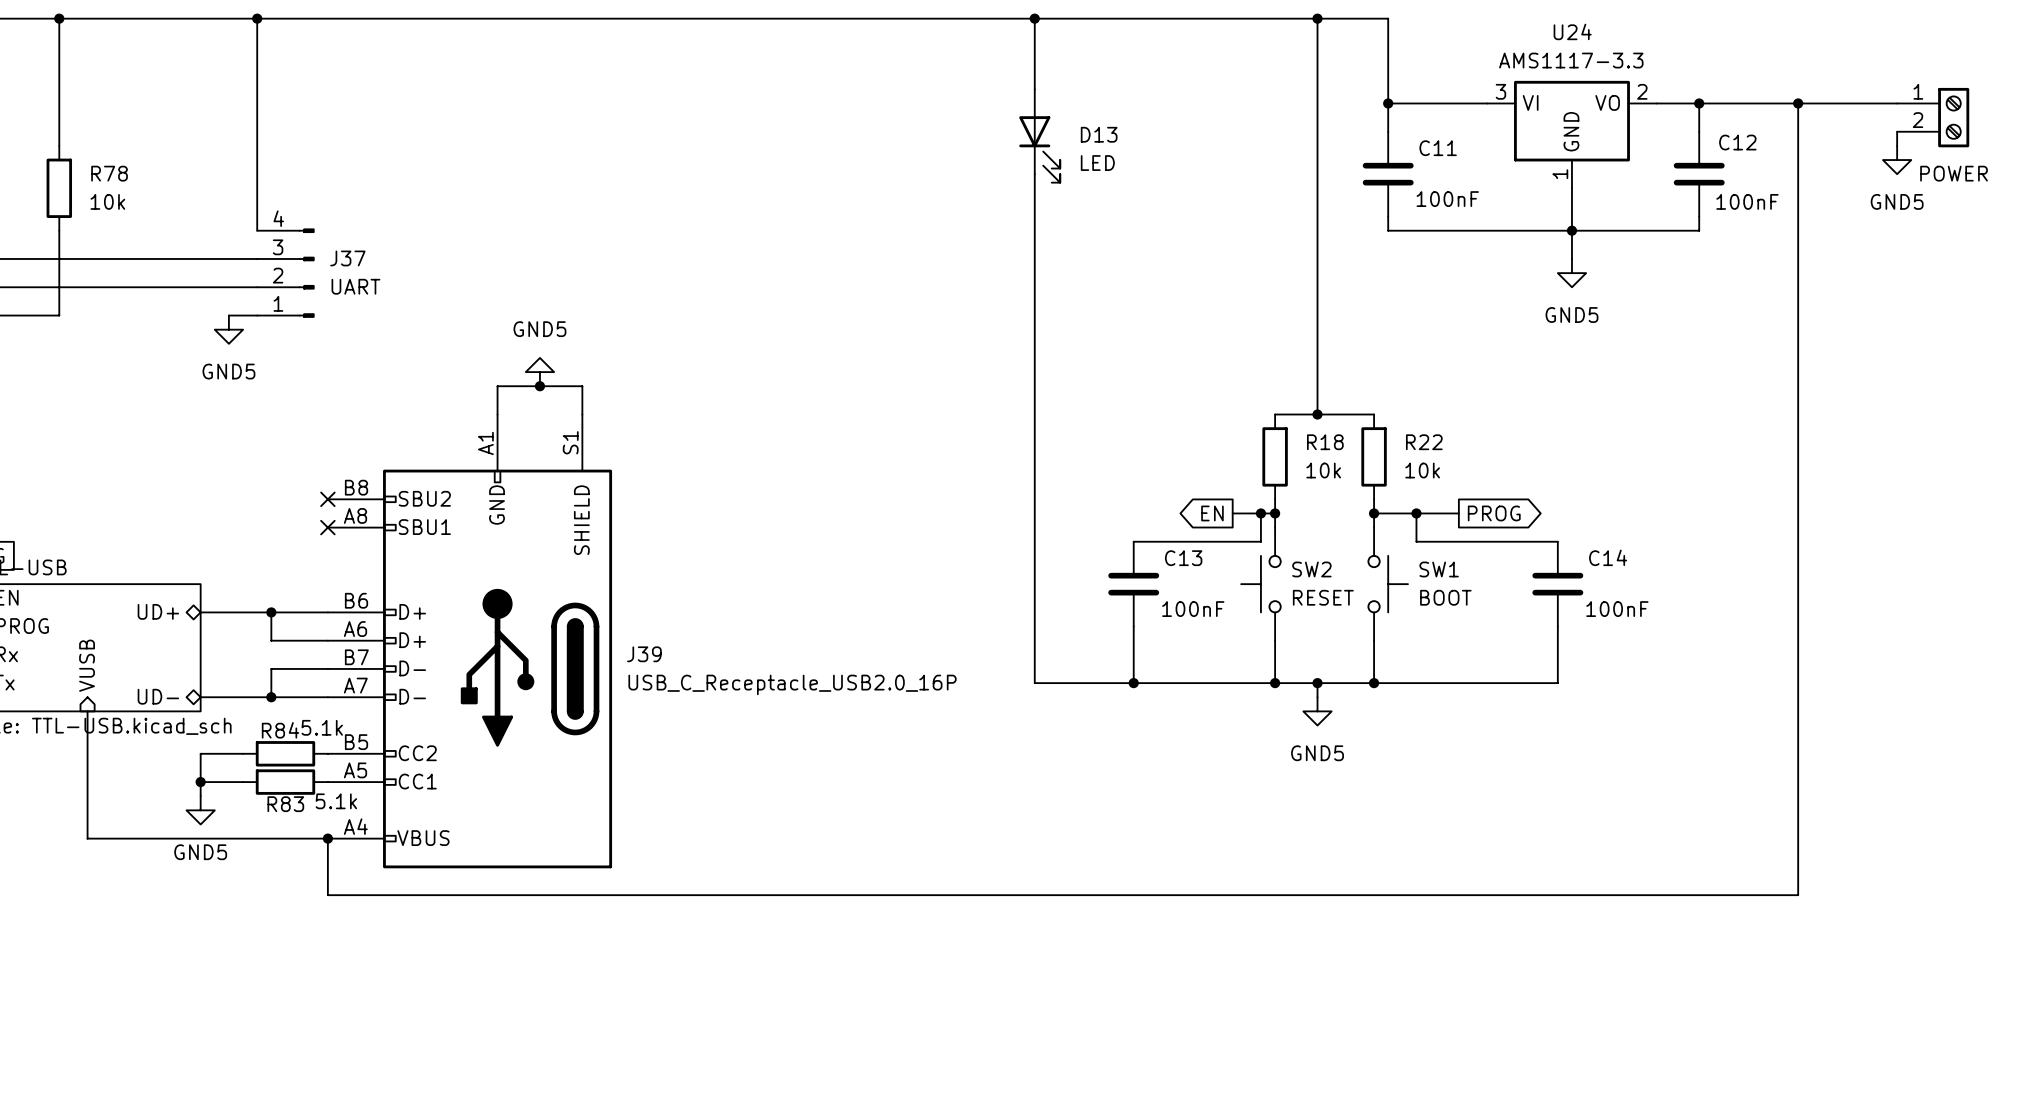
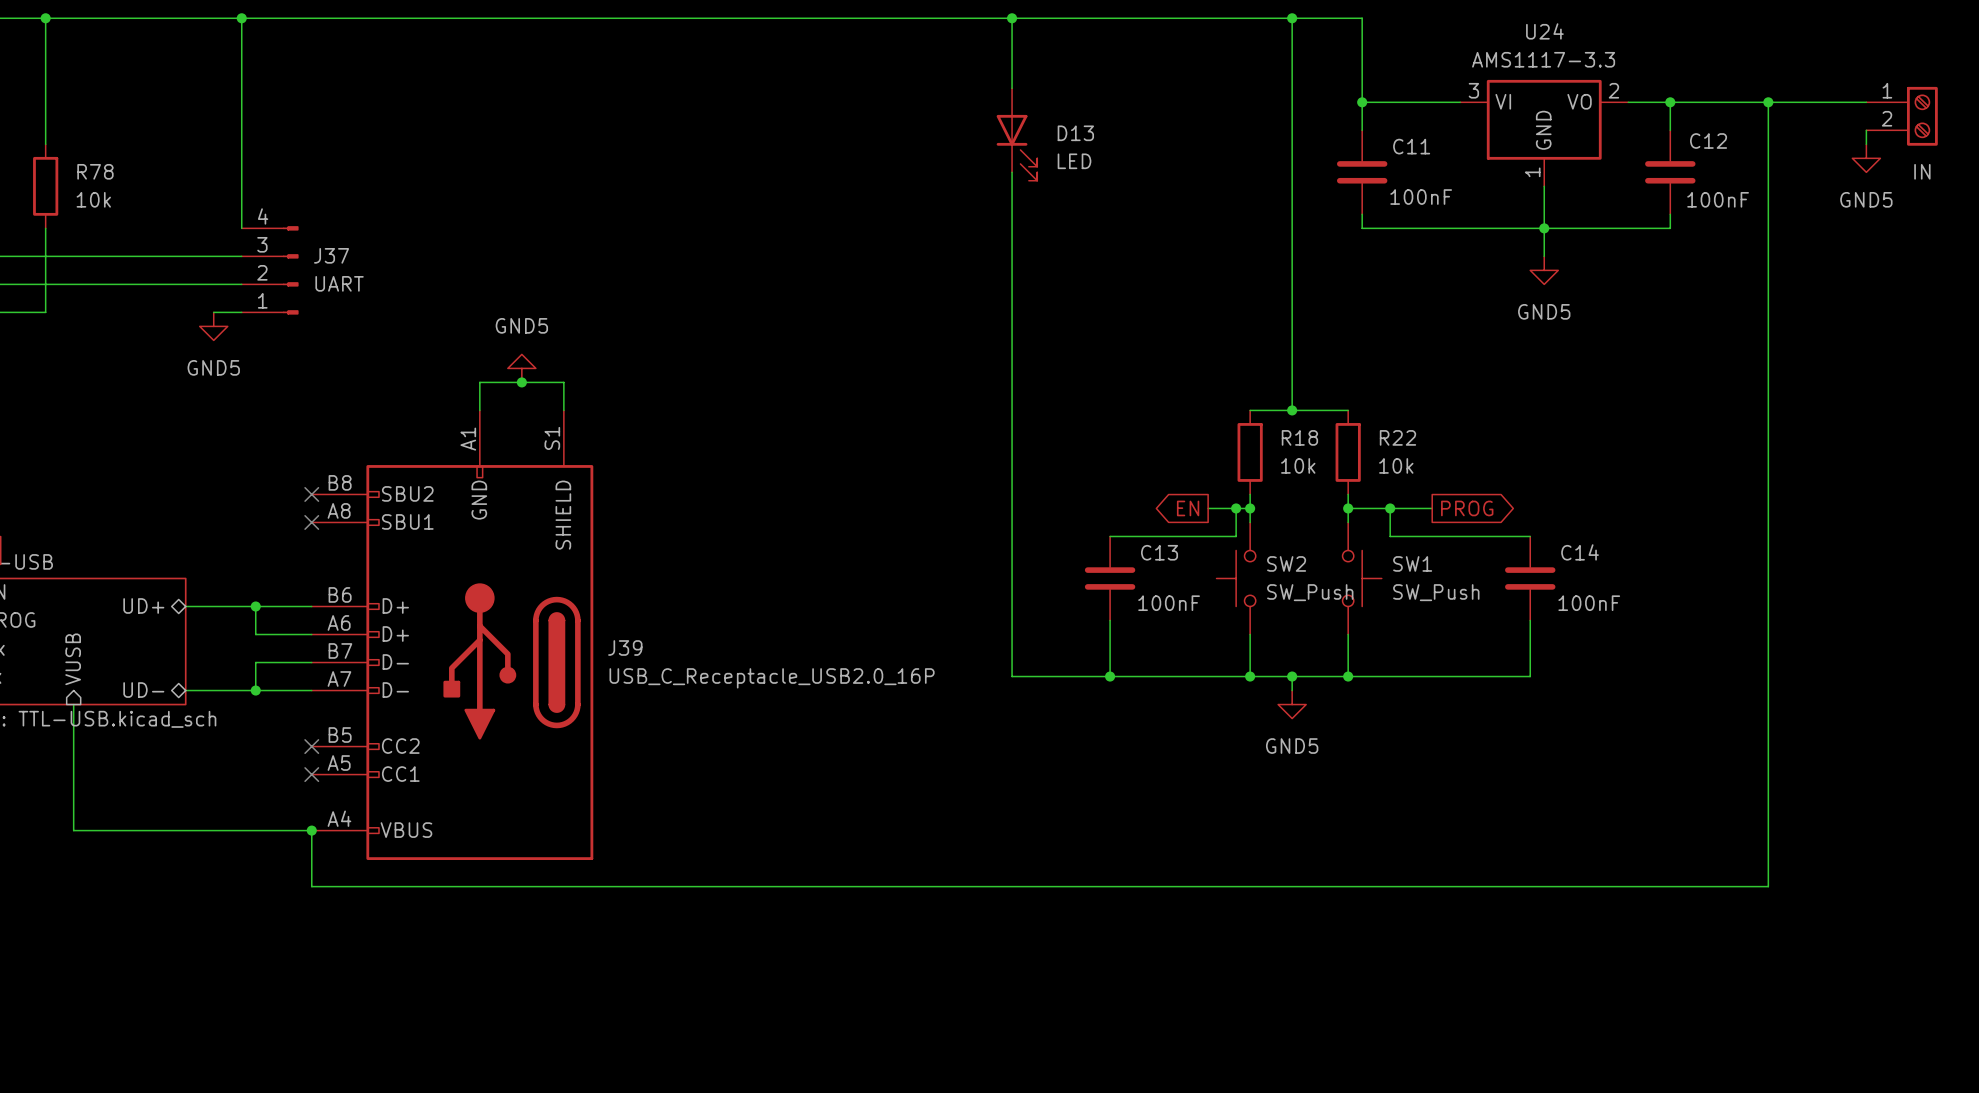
part value: POWER (1954, 173) -> IN (1922, 171)
SW2 value: RESET (1323, 597) -> SW_Push (1310, 592)
SW1 value: BOOT (1445, 597) -> SW_Push (1436, 592)
wire: (243, 753) (200, 753) (200, 796) -> none
R84: 5.1k (285, 753) -> none
no-connect mark: none -> (311, 746)
wire: (200, 782) (243, 782) -> none
junction: (200, 782) -> none
R83: 5.1k (285, 782) -> none
no-connect mark: none -> (311, 774)
power symbol: GND5 (200, 810) -> none

